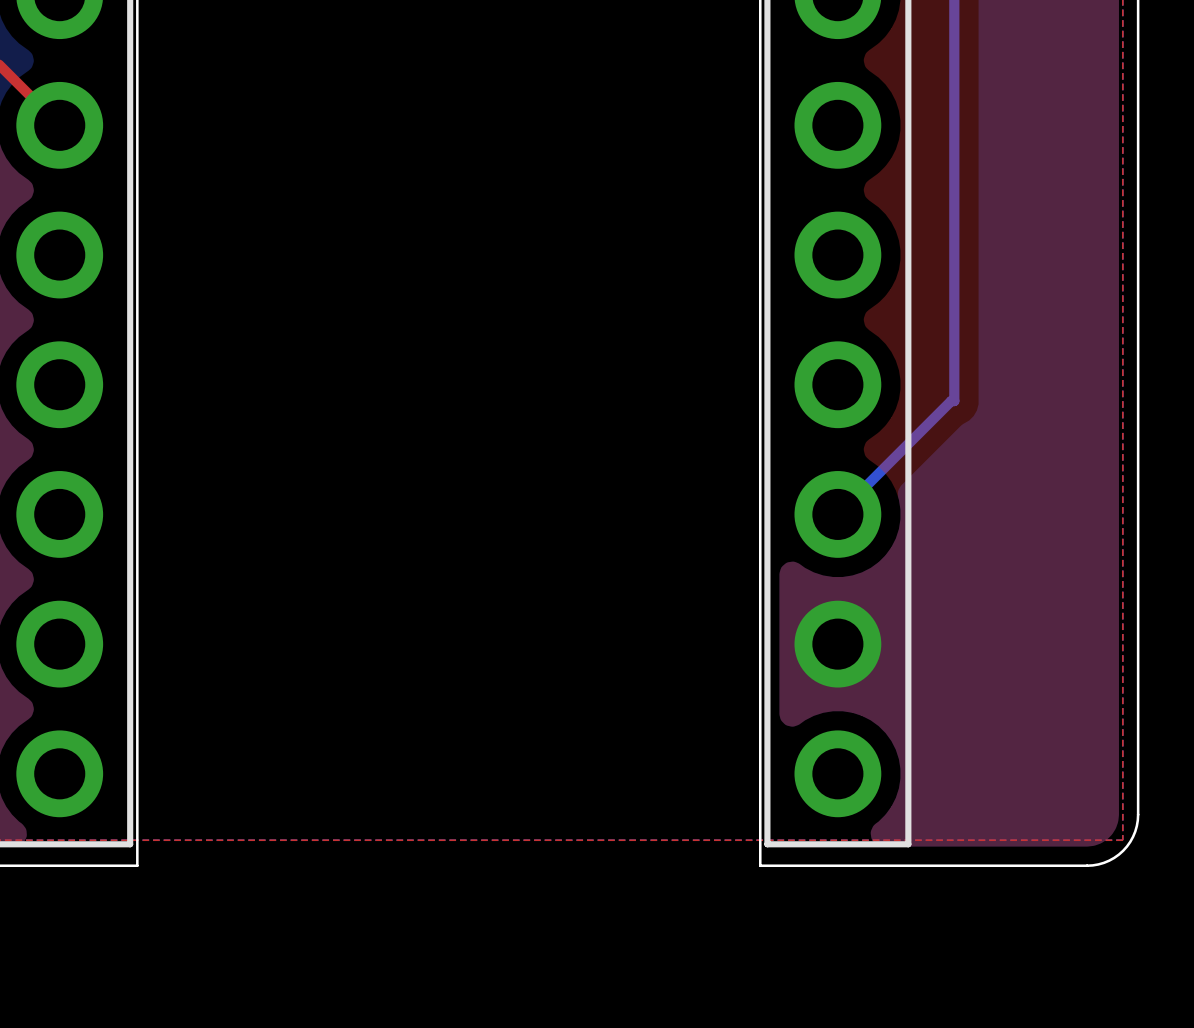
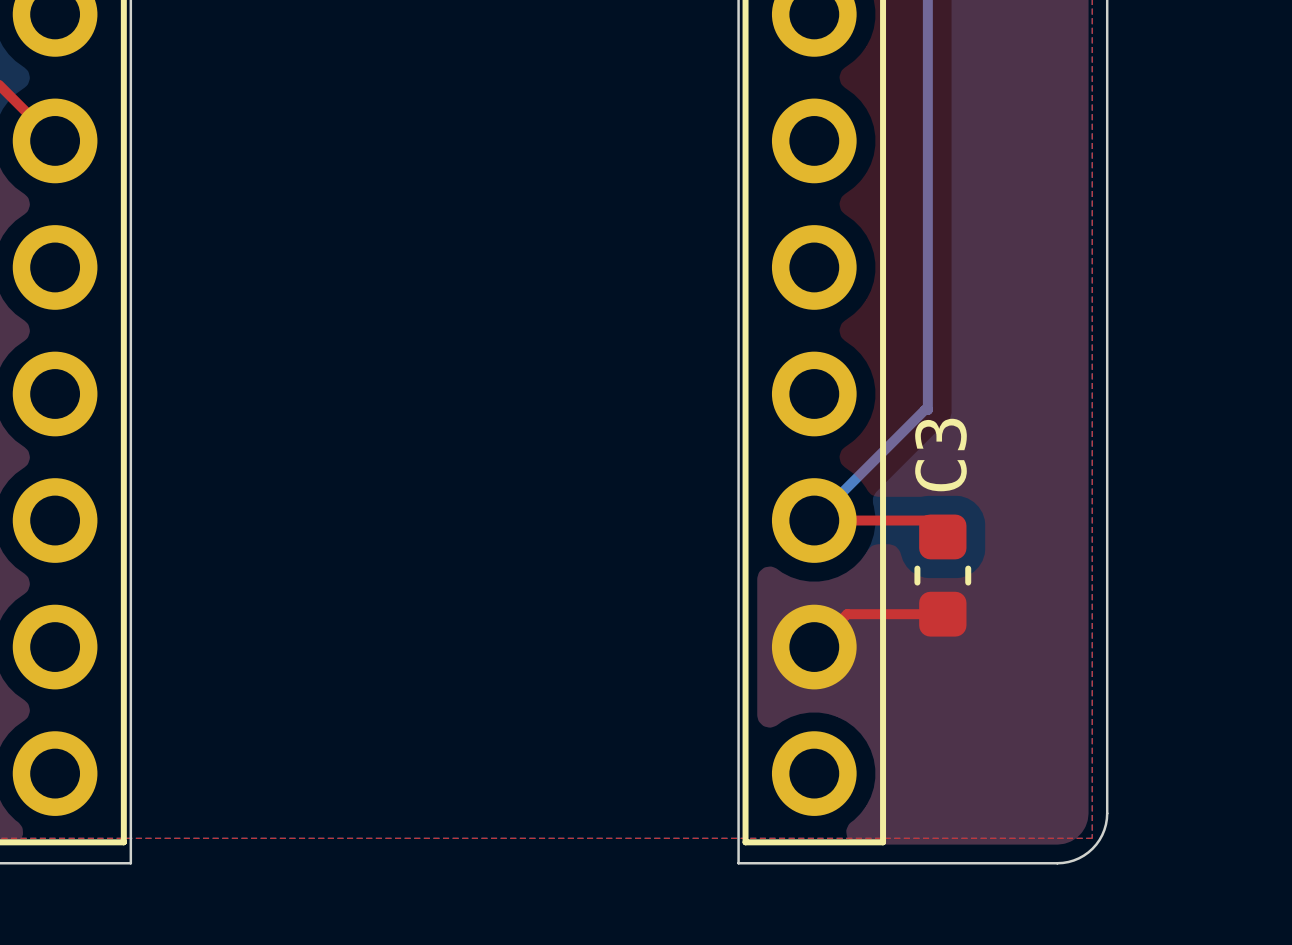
top track: none -> (814, 520) (926, 520) (942, 536)
C3: none -> (942, 575)
top track: none -> (942, 614) (847, 614) (814, 647)

